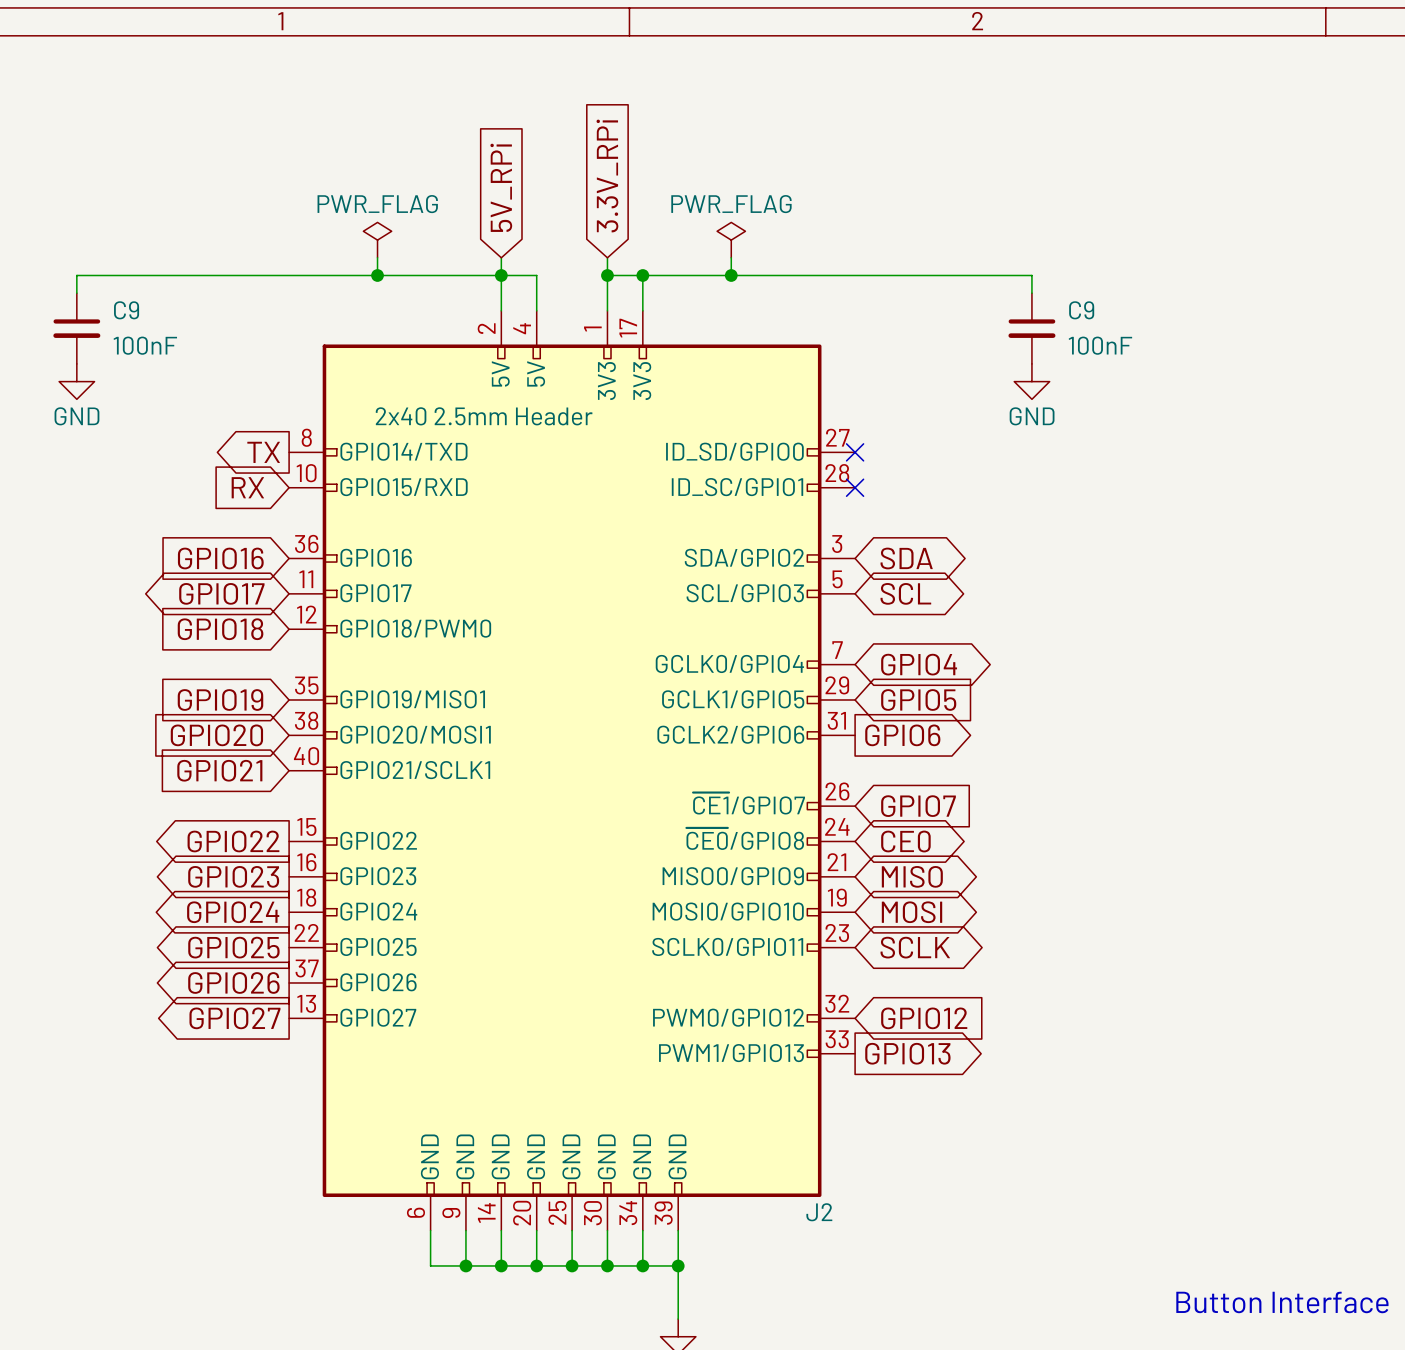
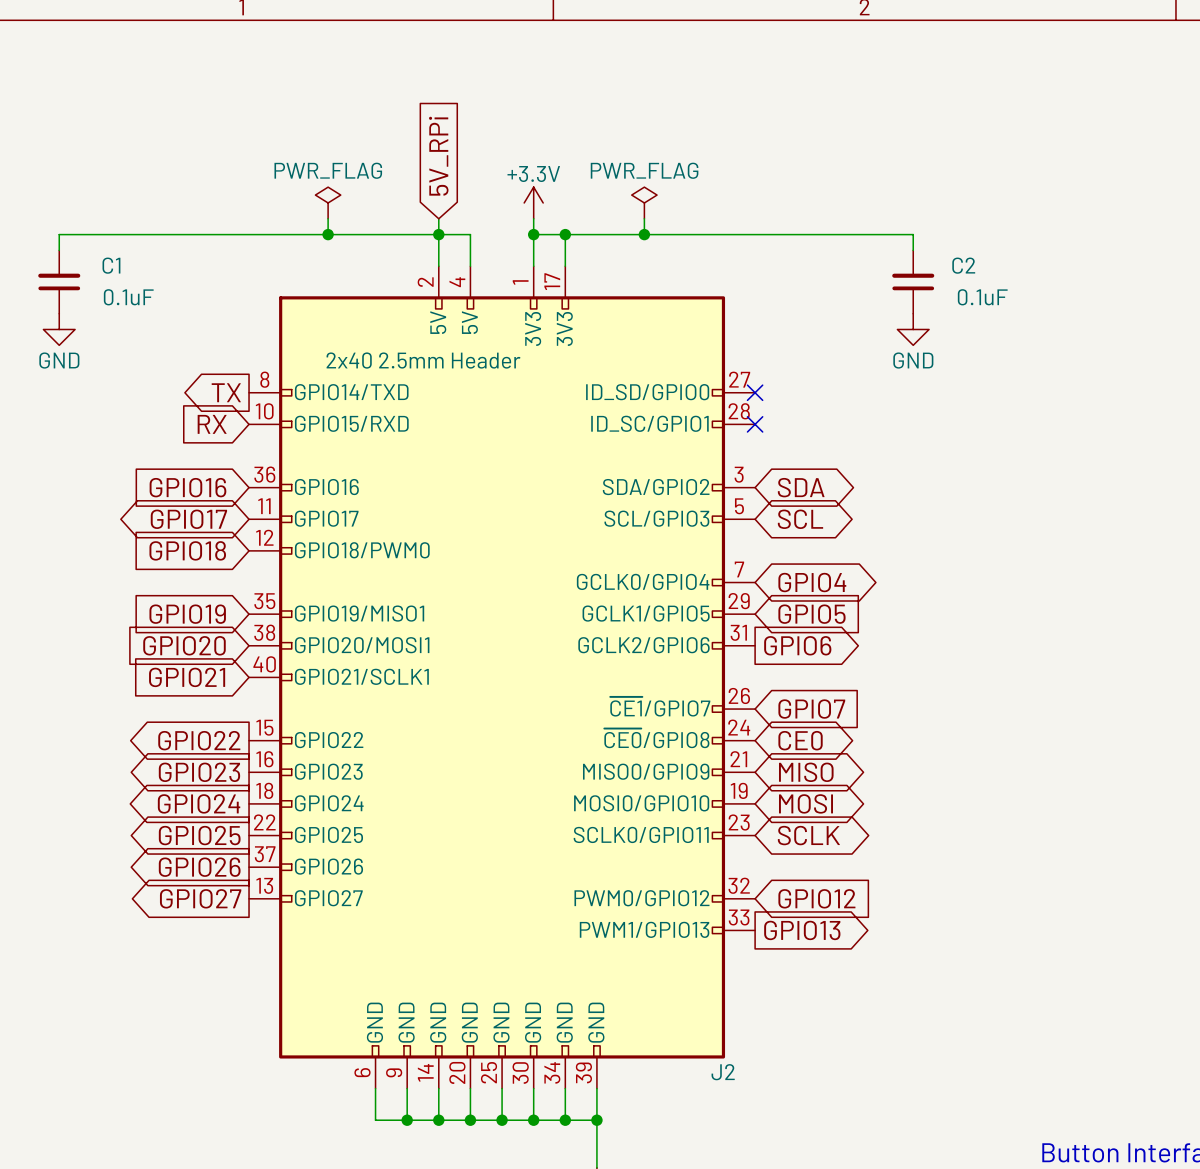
global label: 3.3V_RPi (607, 176) -> none
power symbol: none -> +3.3V (533, 202)
C9: 100nF (76, 328) -> none
C1: none -> 0.1uF (59, 282)
C9: 100nF (1031, 328) -> none
C2: none -> 0.1uF (913, 282)

